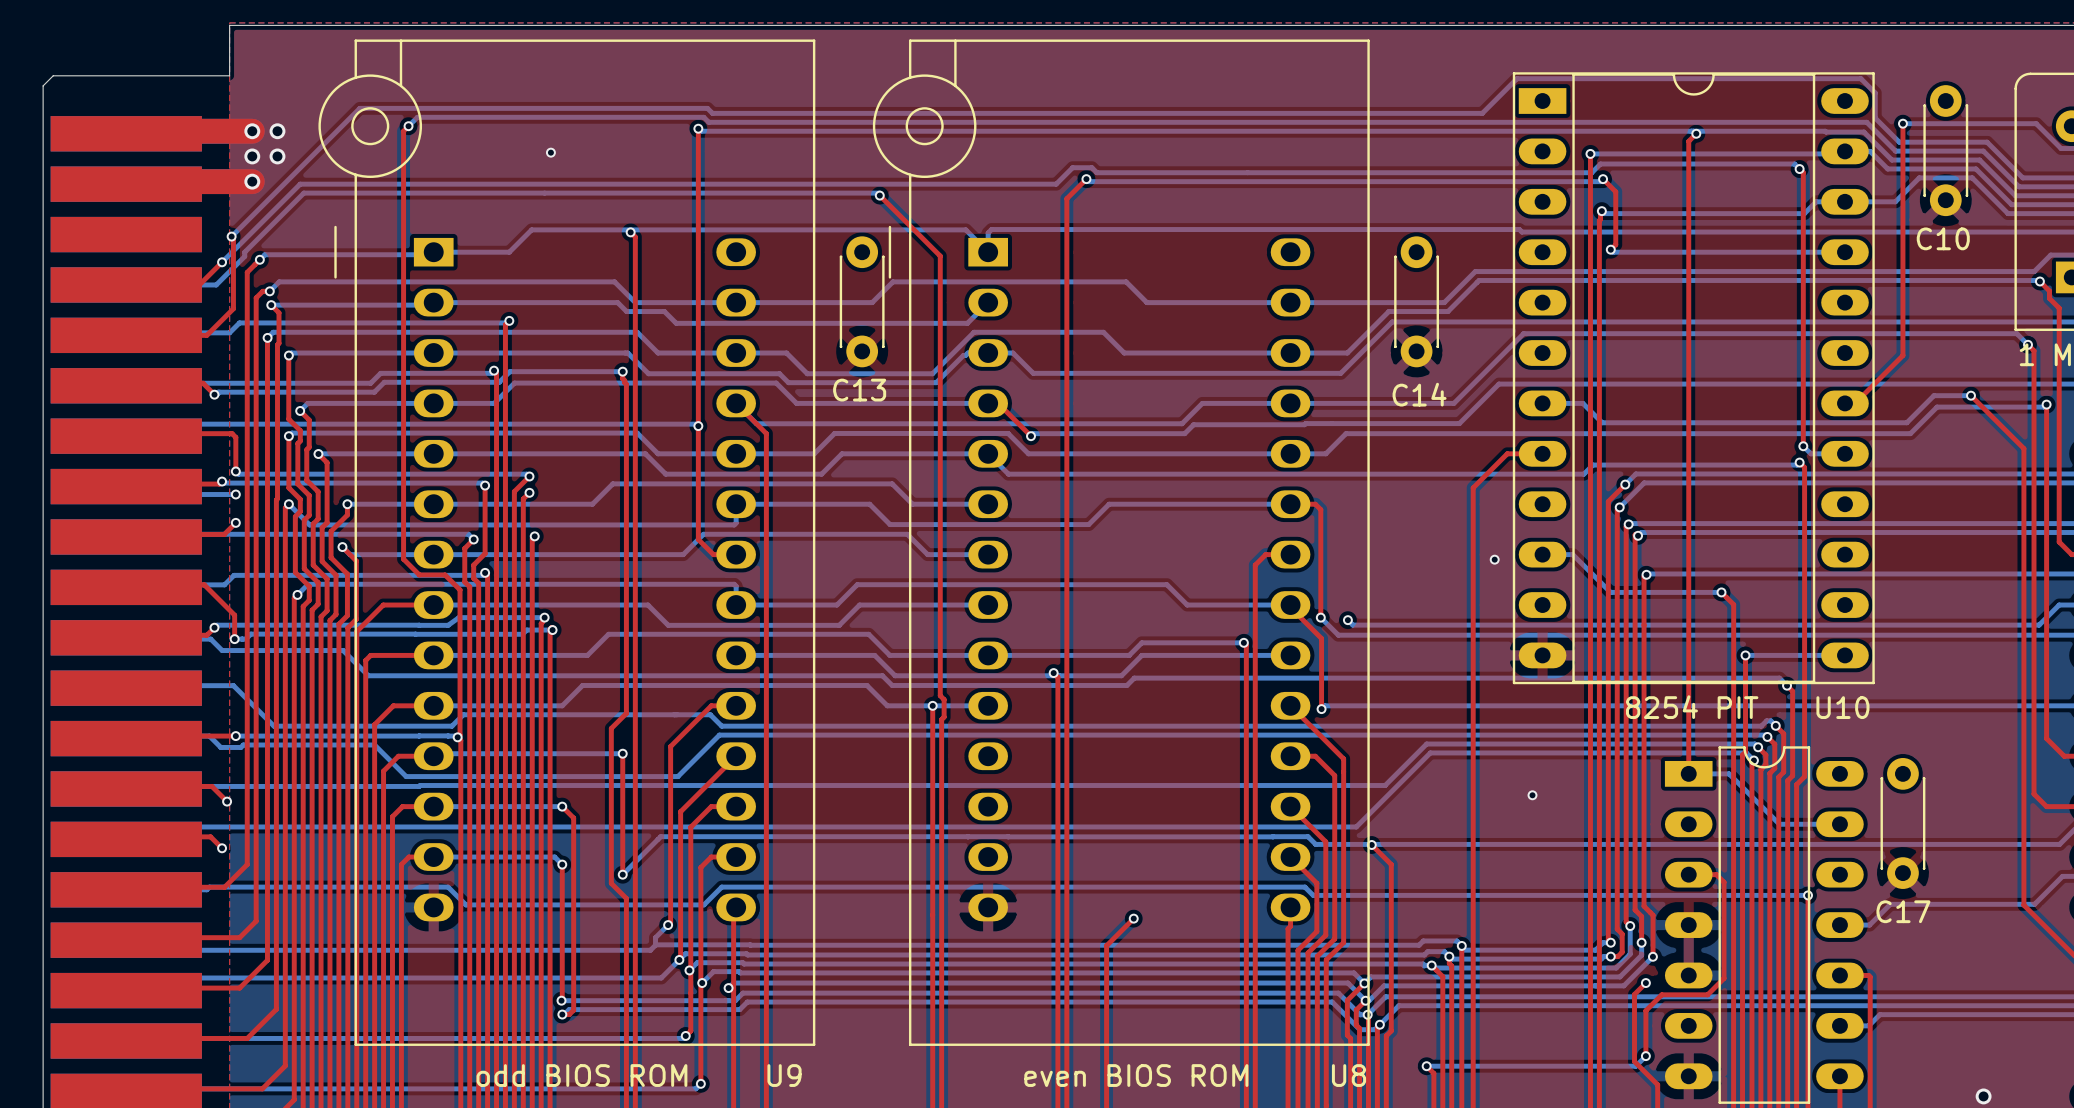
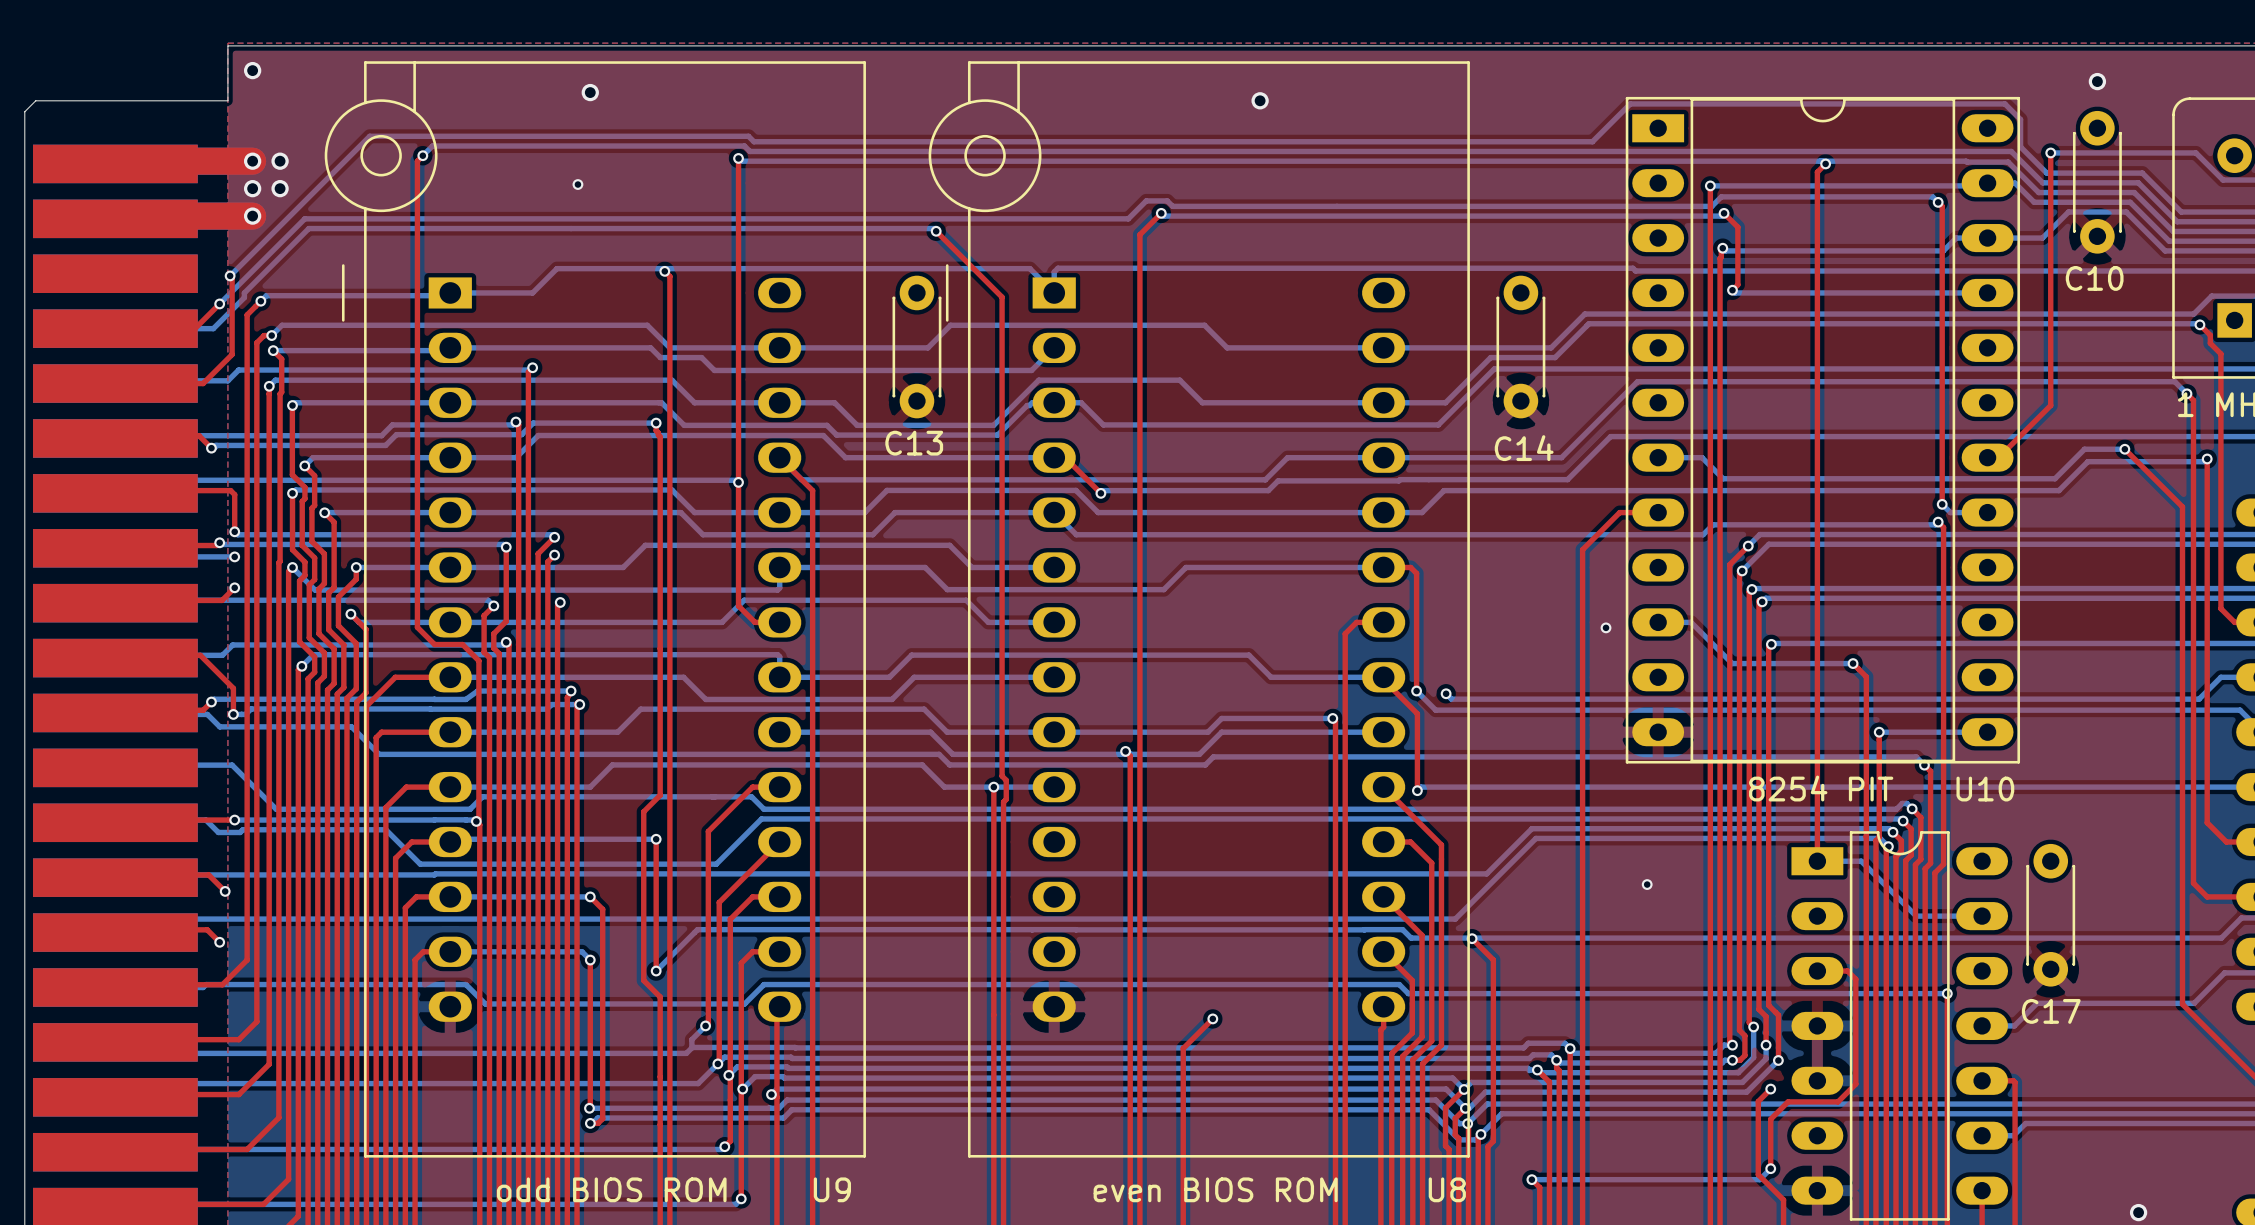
via: none -> (252, 70)
via: none -> (2097, 81)
via: none -> (590, 92)
via: none -> (1260, 100)

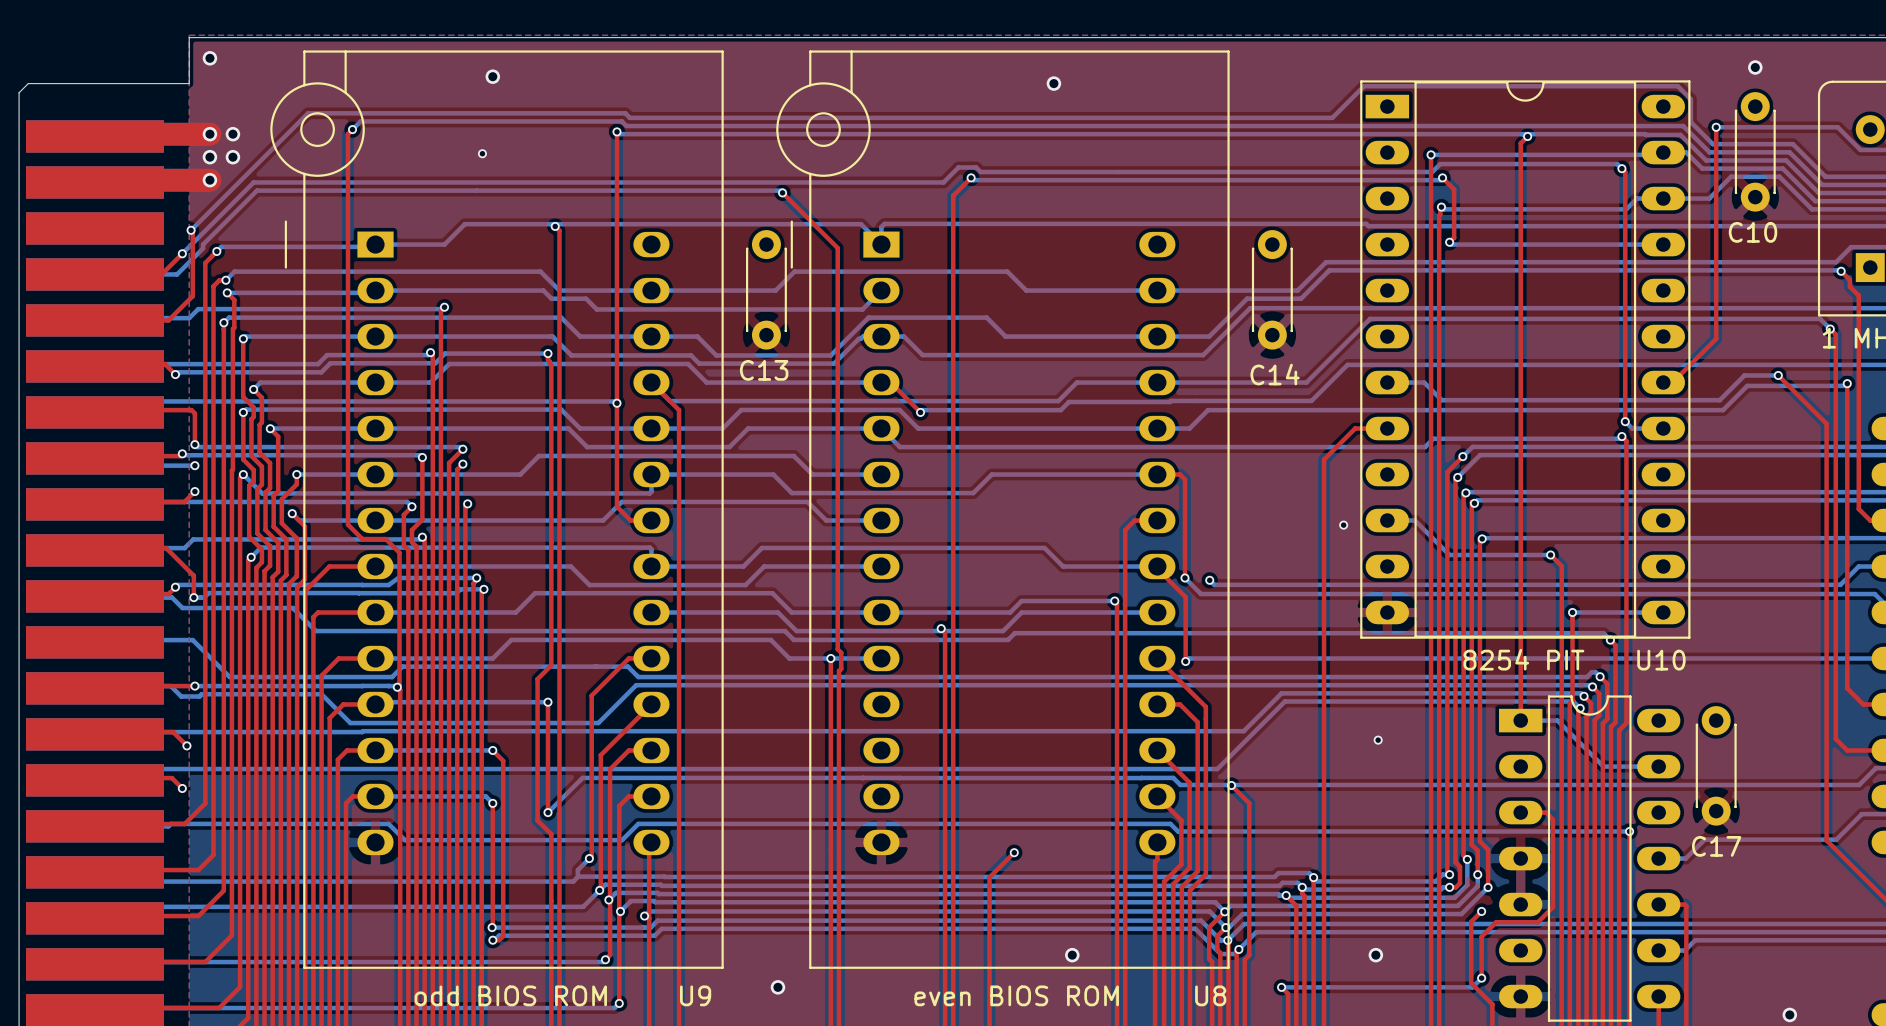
via: none -> (1072, 955)
via: none -> (1375, 955)
via: none -> (777, 987)

